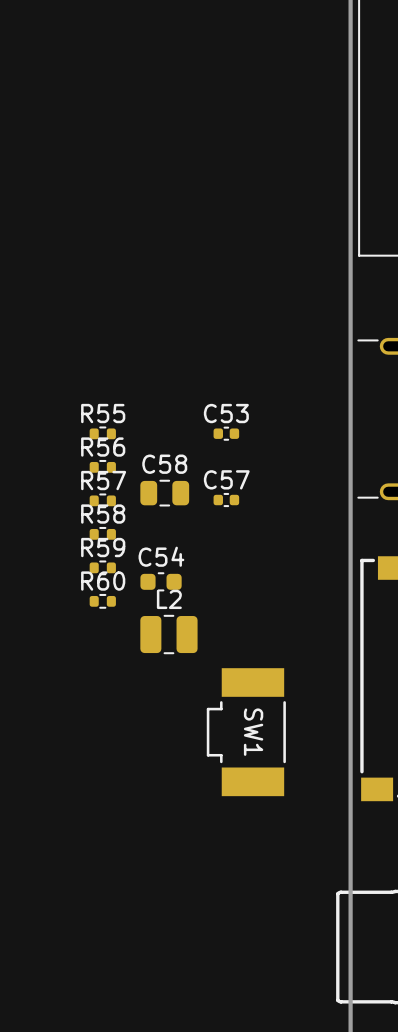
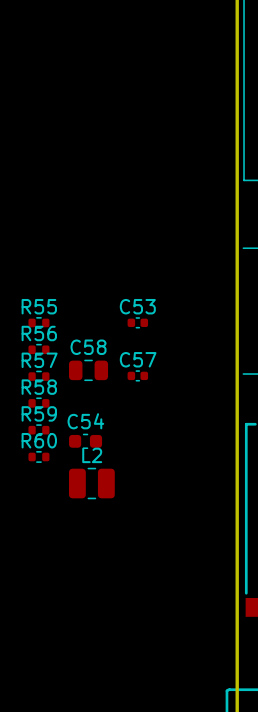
SW1: (246, 732) -> none

